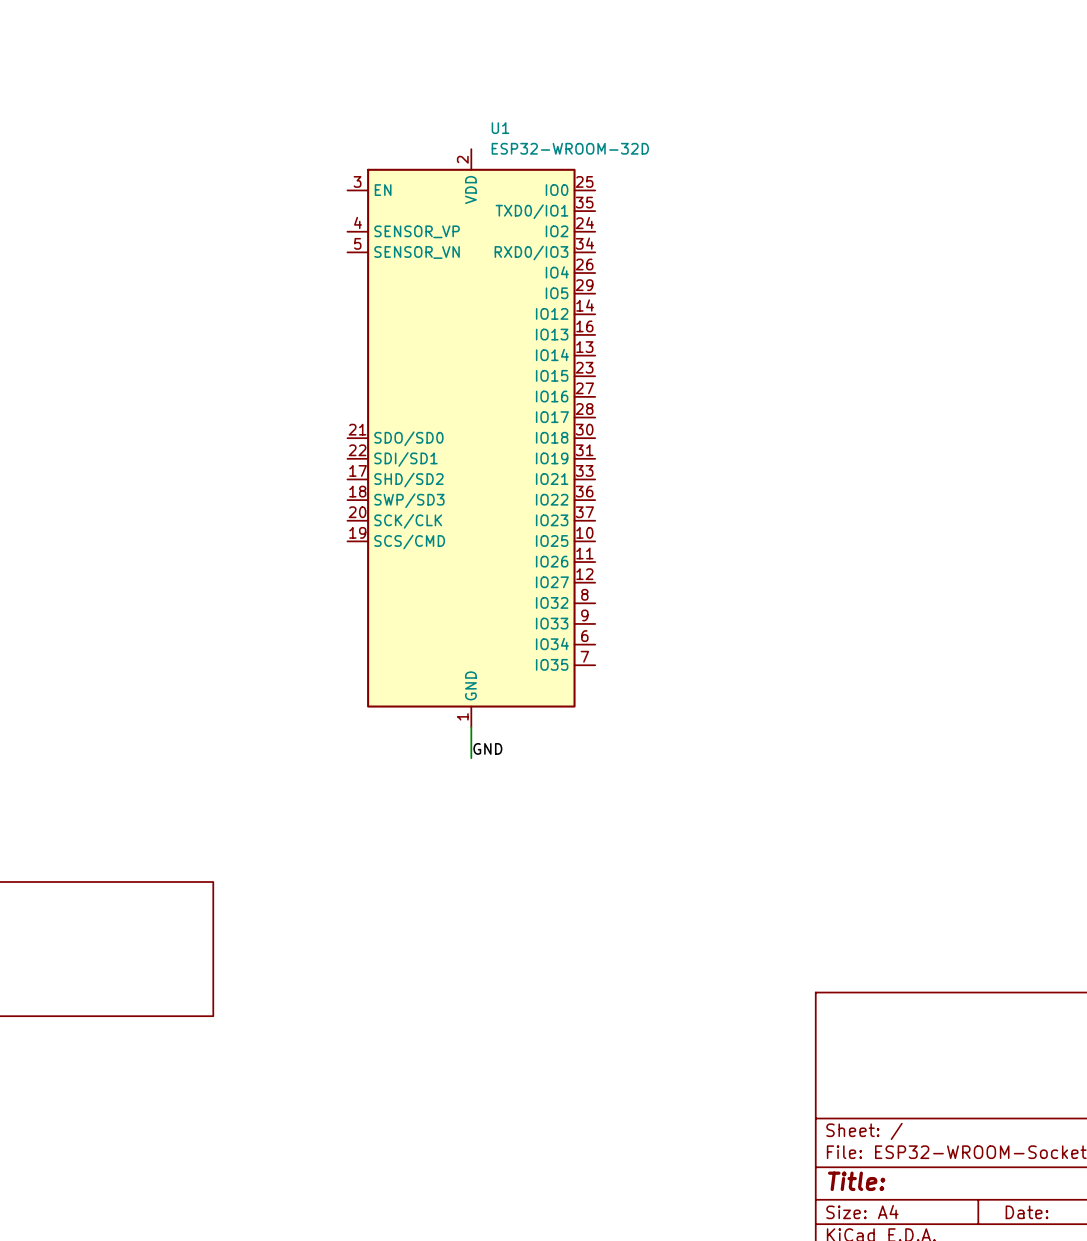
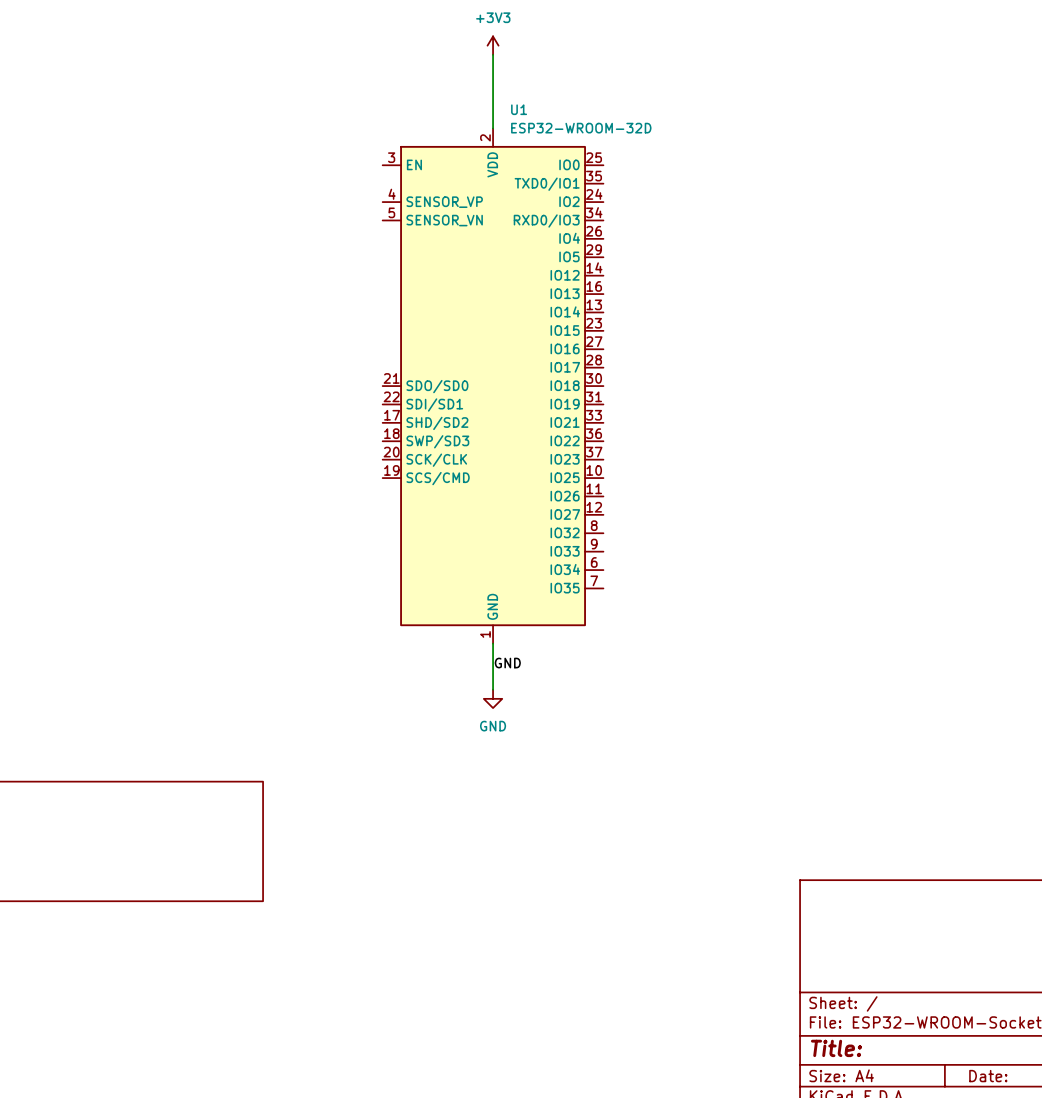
power symbol: none -> +3V3 (493, 45)
wire: none -> (493, 54) (493, 128)
wire: none -> (493, 671) (493, 689)
power symbol: none -> GND (493, 698)

